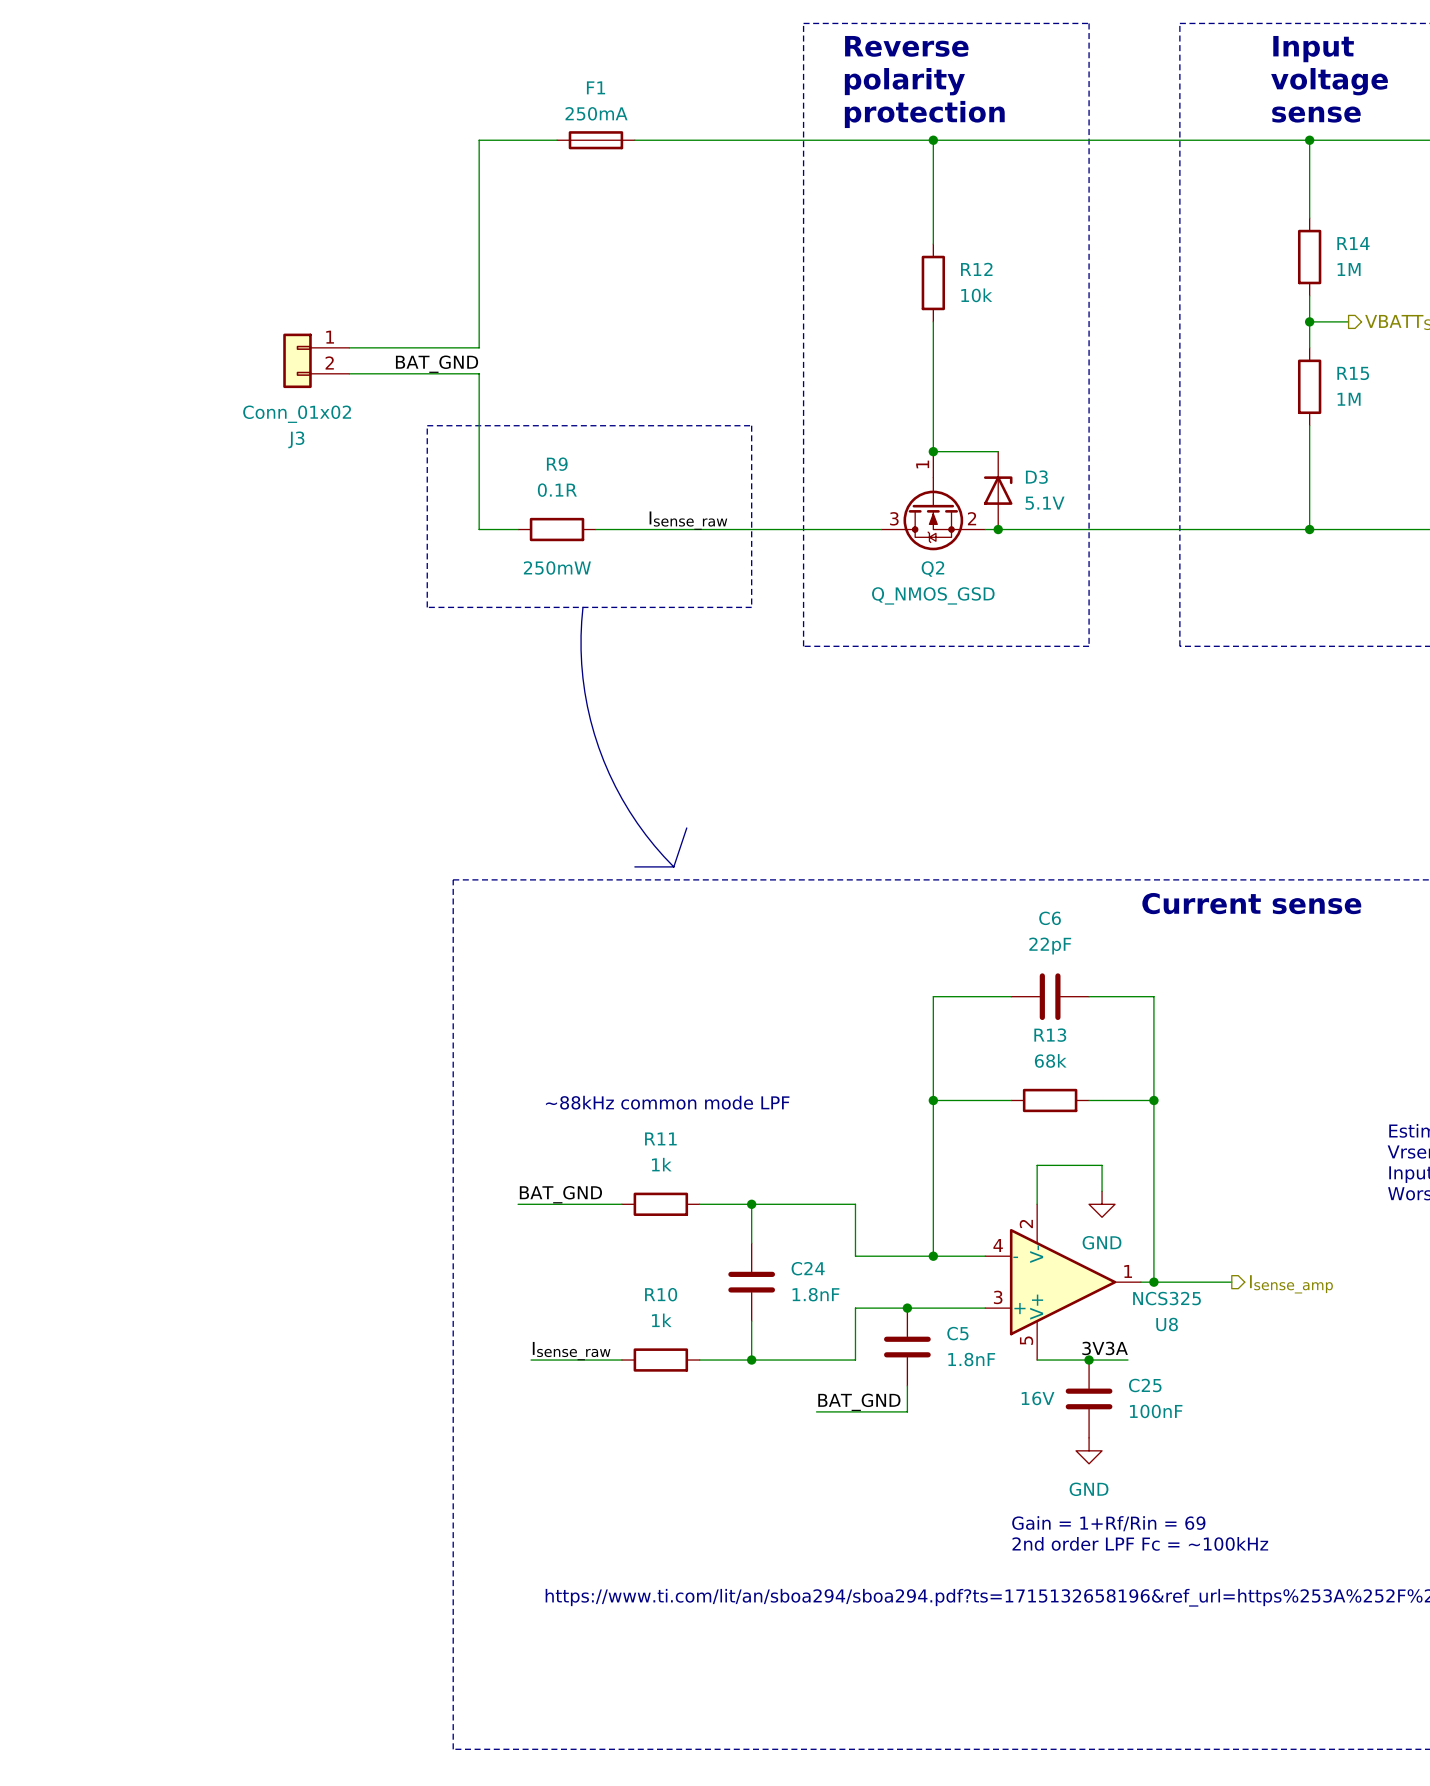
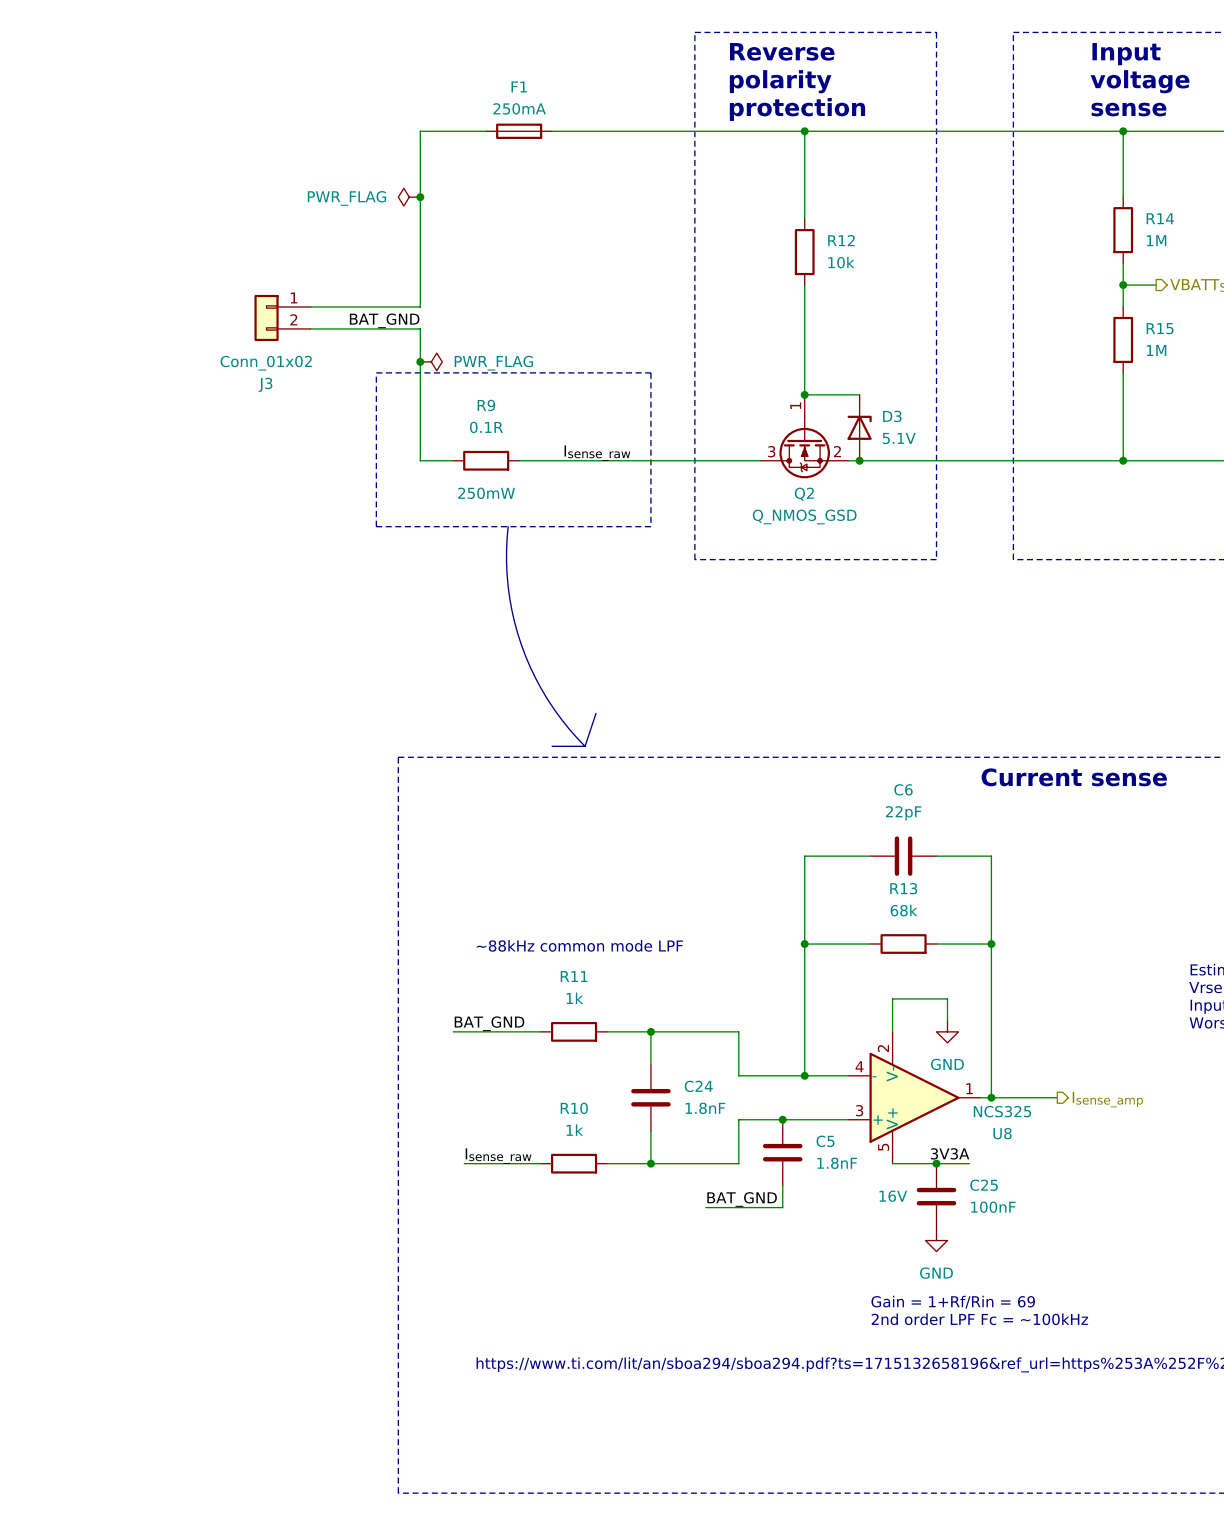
power symbol: none -> PWR_FLAG (409, 197)
junction: none -> (420, 197)
junction: none -> (420, 361)
power symbol: none -> PWR_FLAG (431, 361)

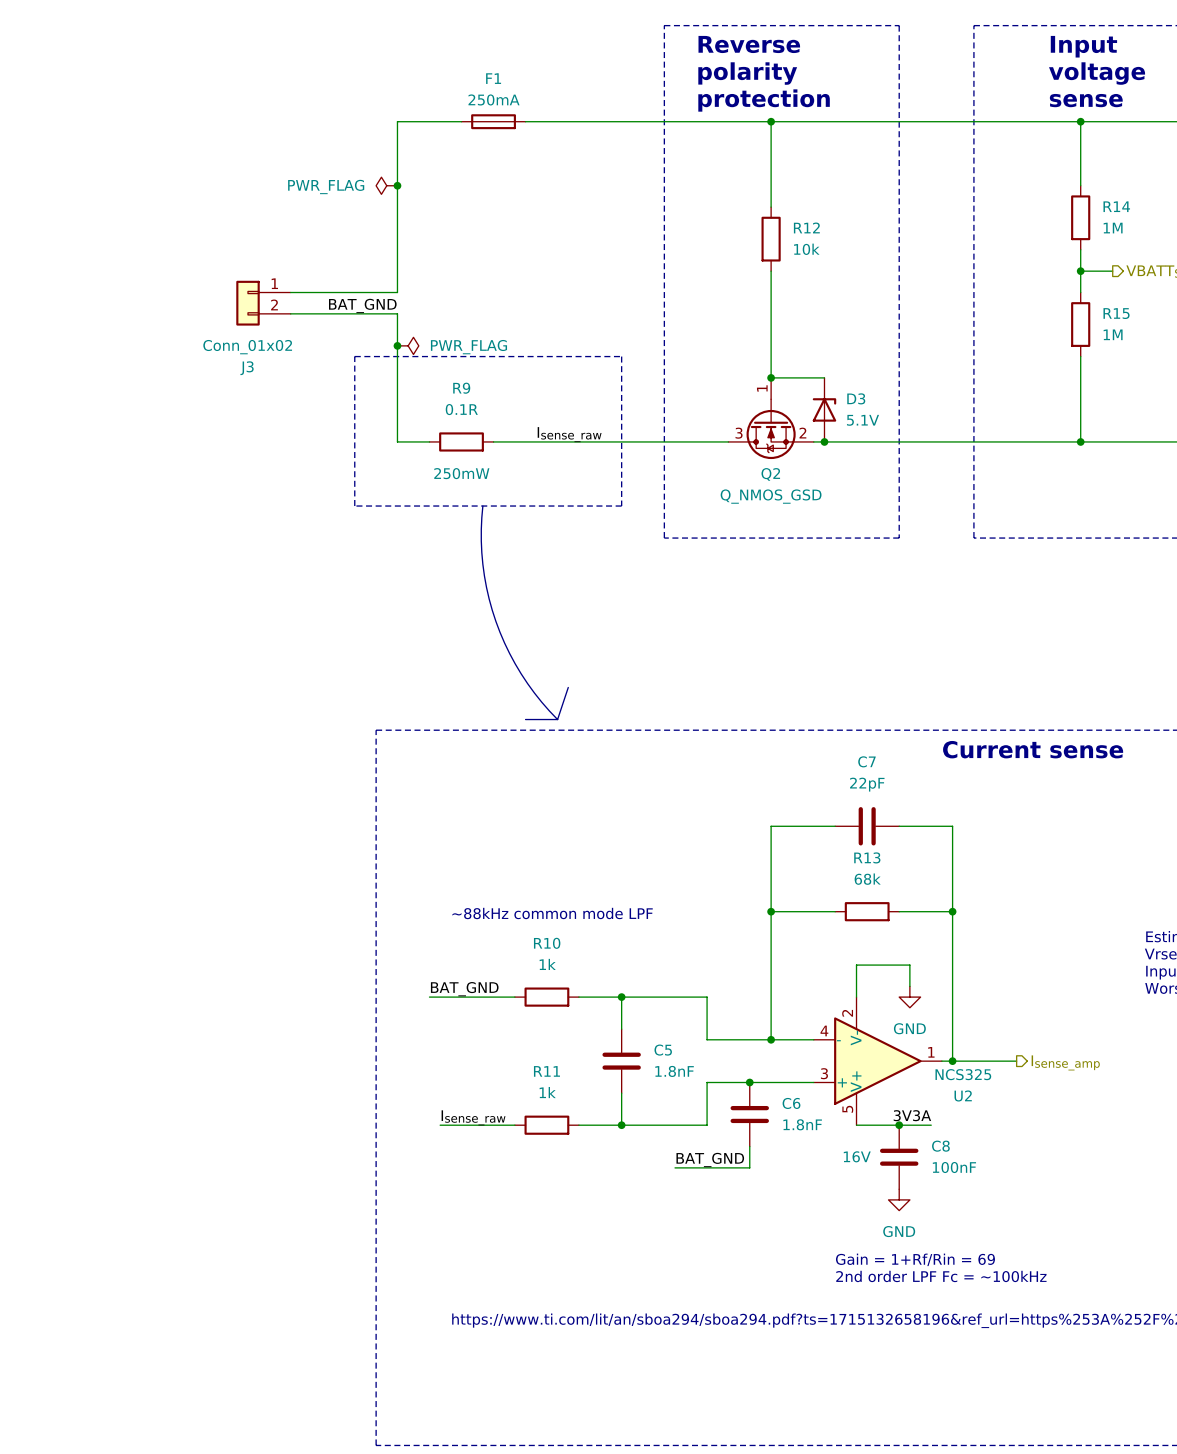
C6 name: C6 (903, 789) -> C7 (866, 761)
R11 name: R11 (574, 976) -> R10 (547, 943)
C24 name: C24 (698, 1086) -> C5 (663, 1050)
R10 name: R10 (574, 1108) -> R11 (546, 1071)
U8 name: U8 (1002, 1133) -> U2 (963, 1095)
C5 name: C5 (825, 1141) -> C6 (791, 1103)
C25 name: C25 (984, 1185) -> C8 (940, 1146)

